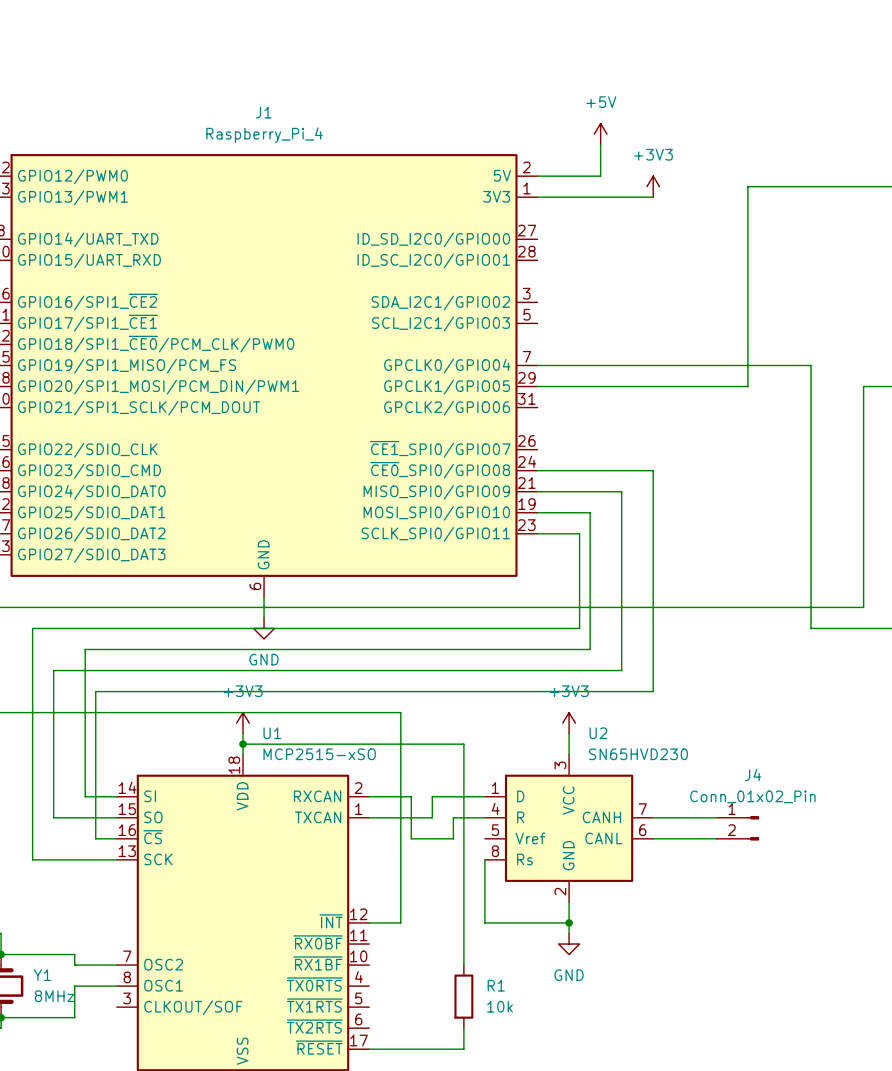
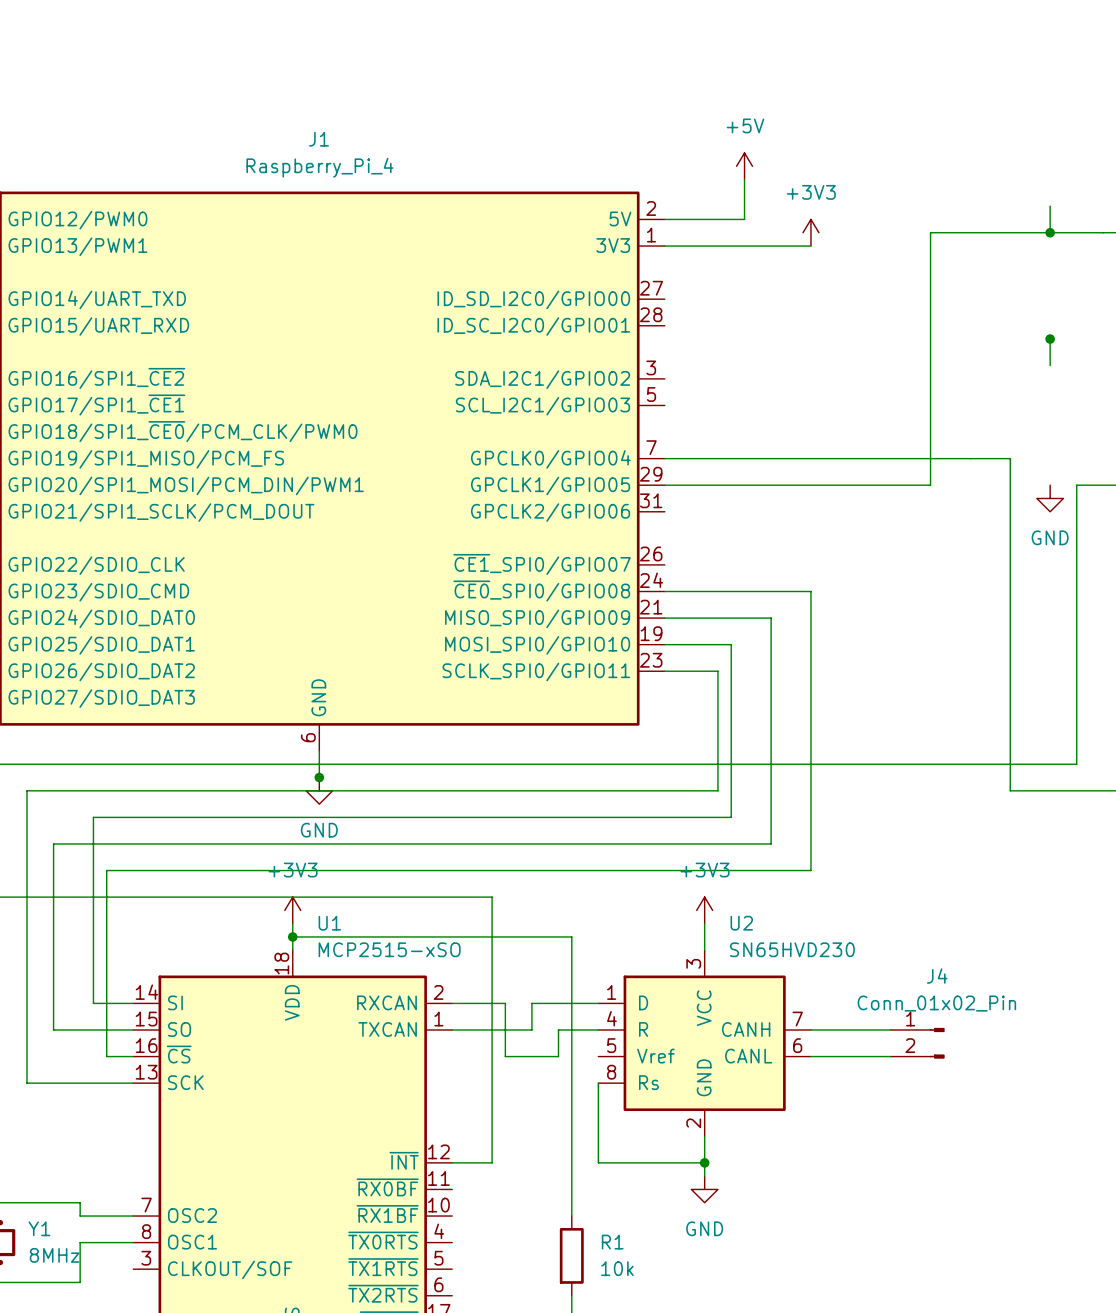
wire: none -> (1050, 206) (1050, 232)
junction: none -> (1050, 232)
wire: none -> (1050, 339) (1050, 365)
junction: none -> (1050, 339)
power symbol: none -> GND (1050, 498)
junction: none -> (319, 777)

